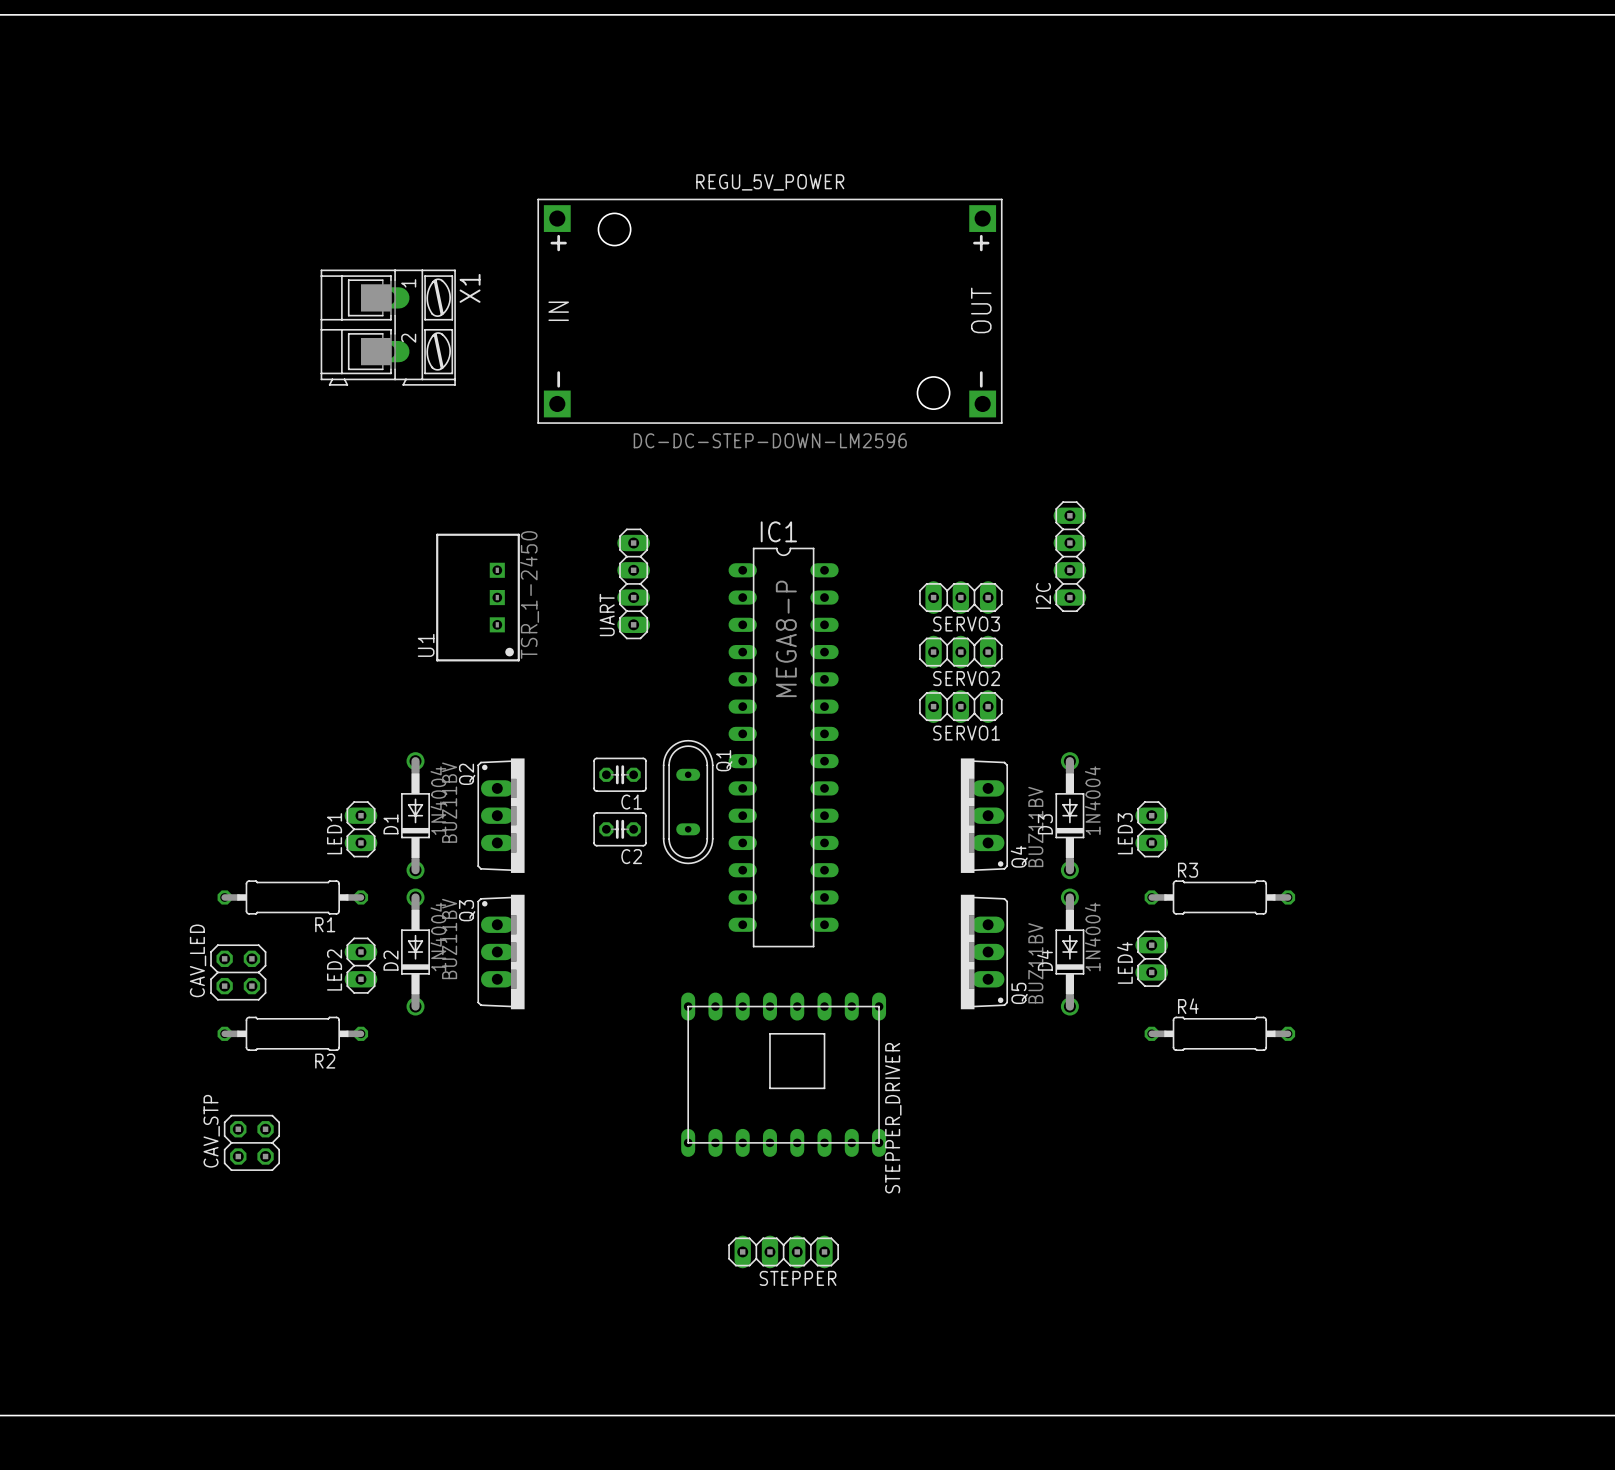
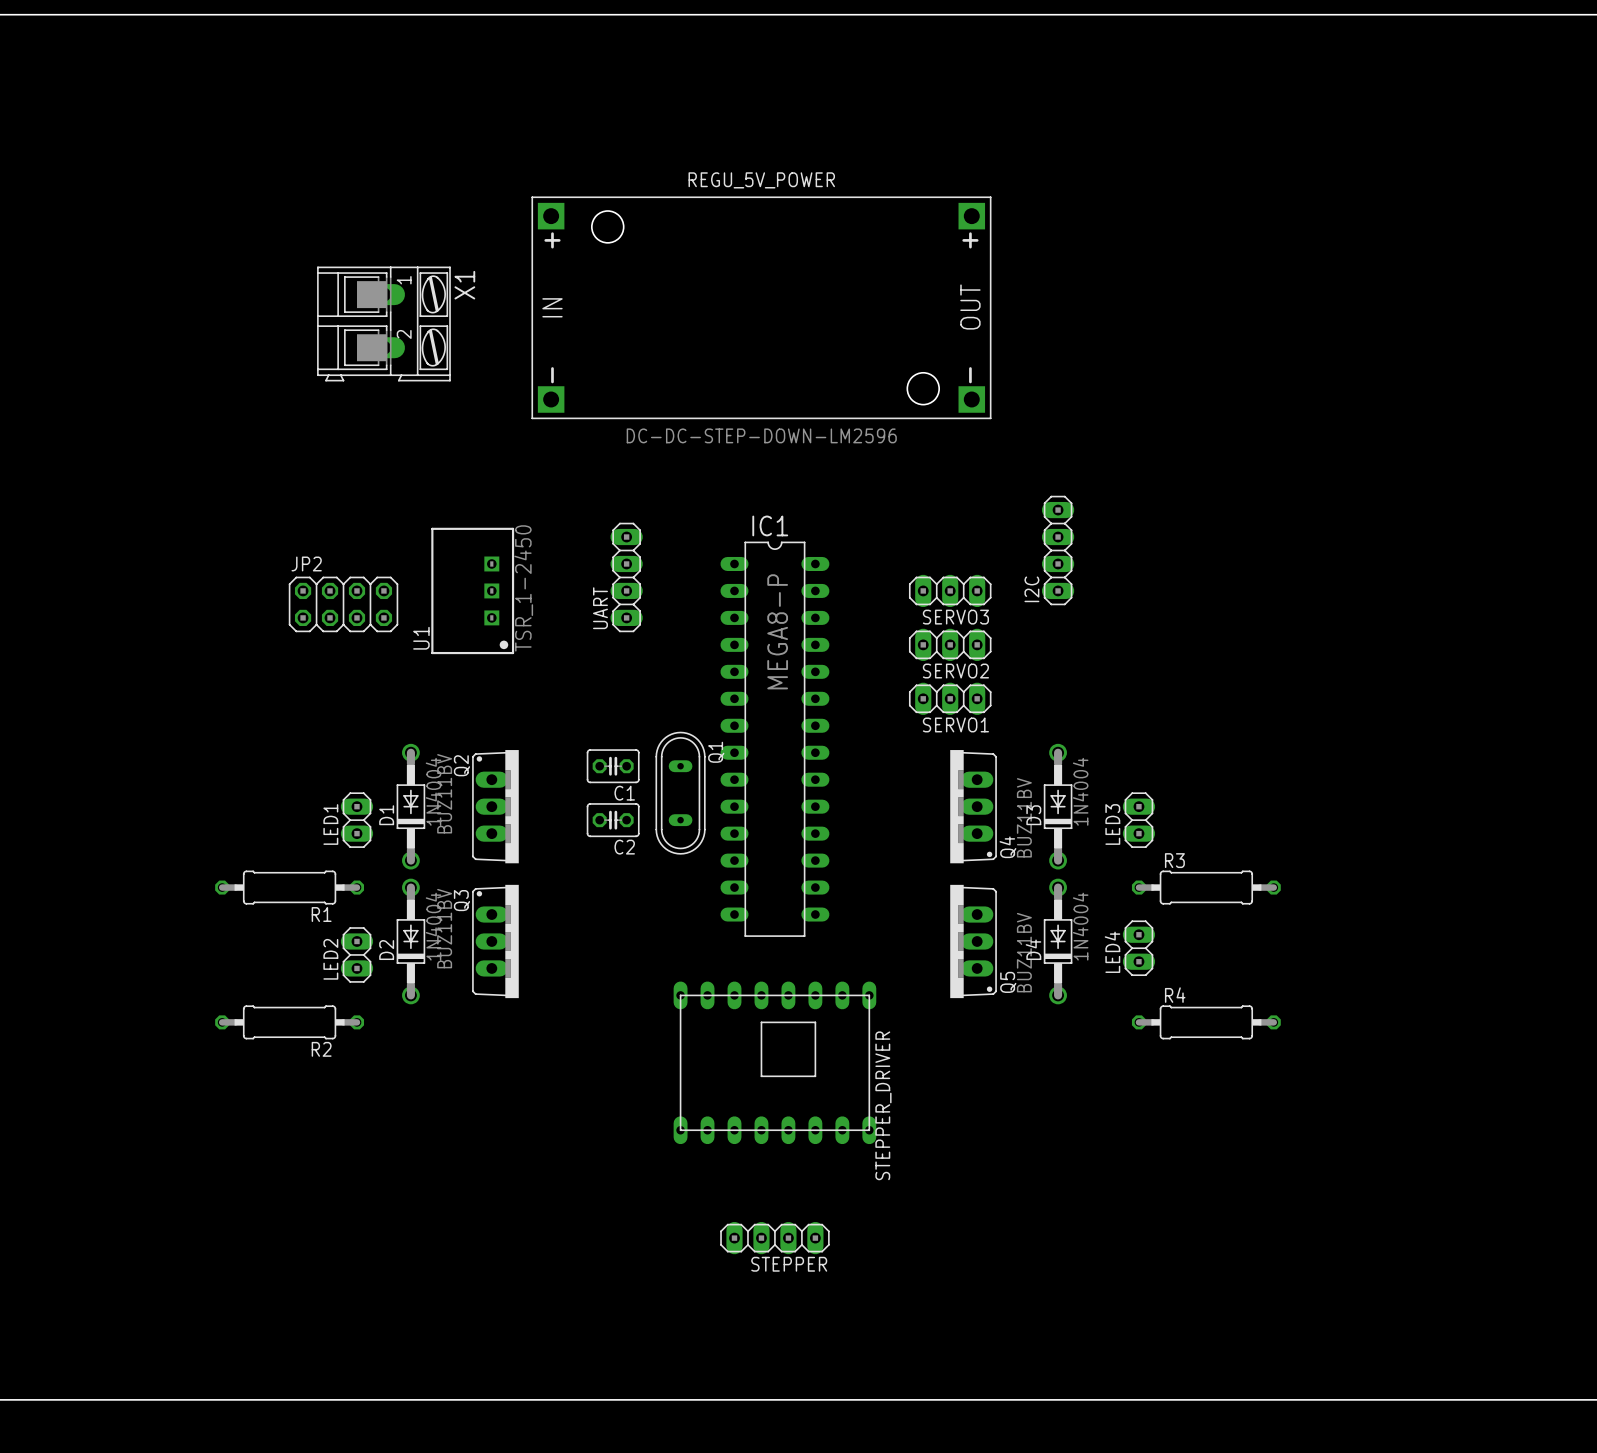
JP2: none -> (343, 604)
CAV_LED: (238, 972) -> none
CAV_STP: (251, 1142) -> none

